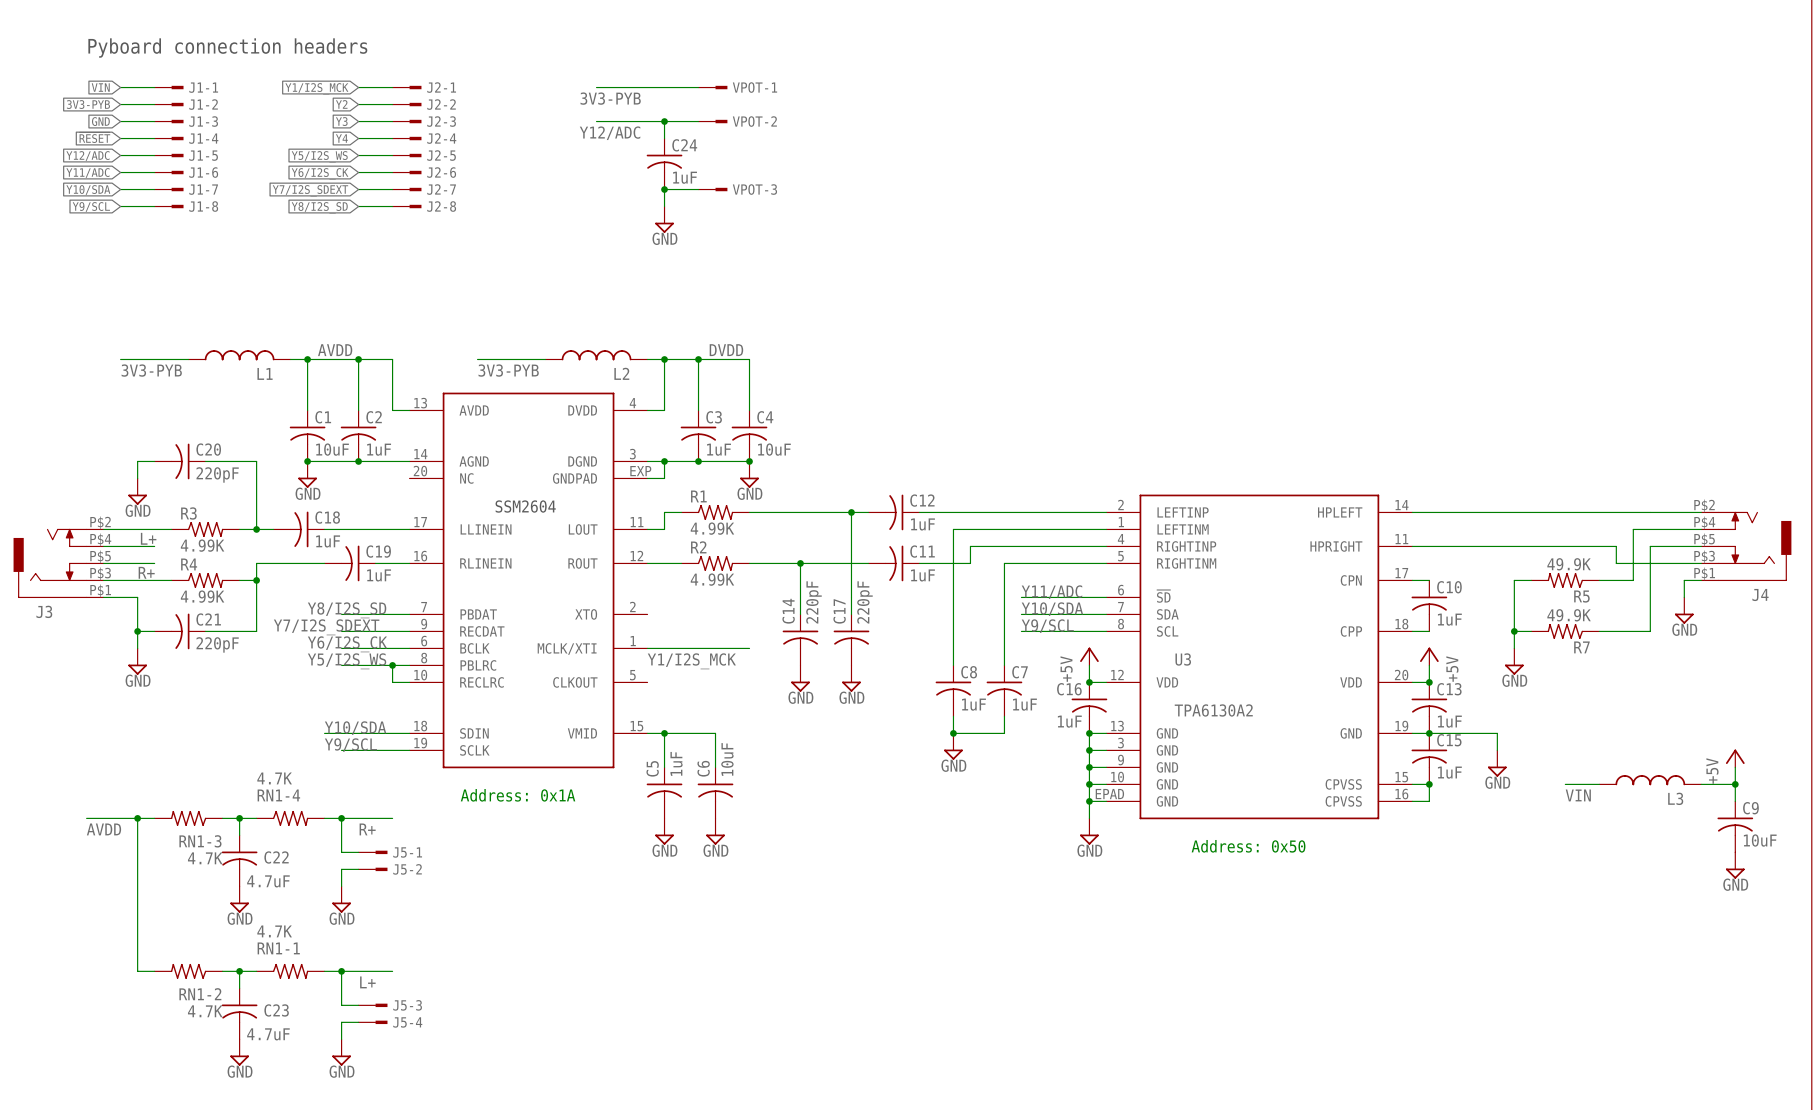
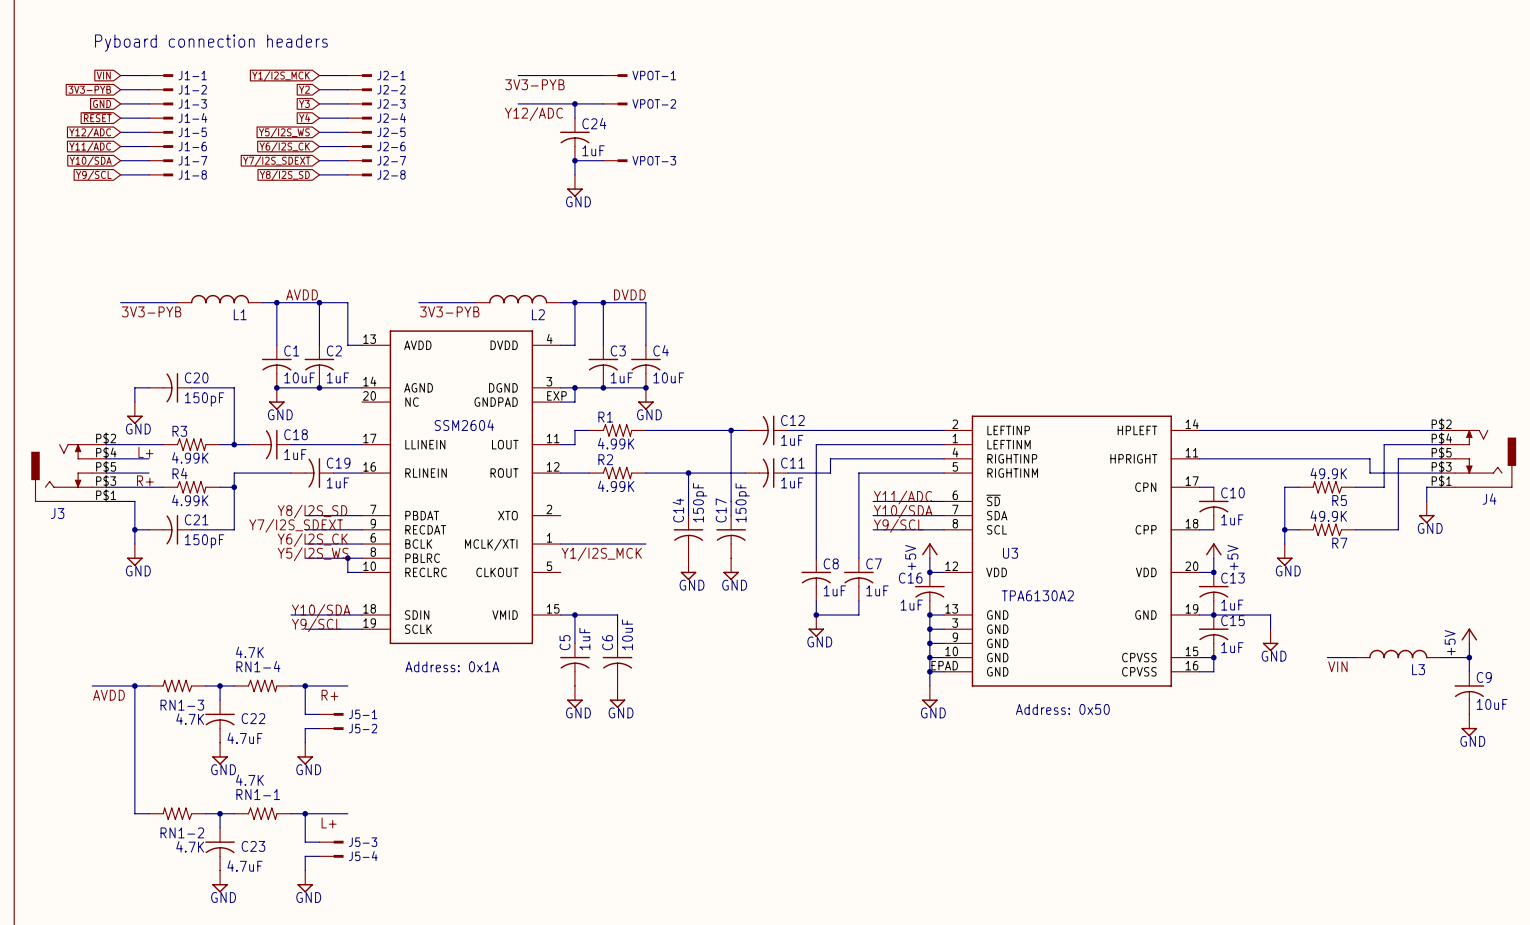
C20 value: 220pF (217, 474) -> 150pF (204, 399)
C14 value: 220pF (813, 602) -> 150pF (700, 502)
C17 value: 220pF (864, 602) -> 150pF (742, 502)
C21 value: 220pF (217, 644) -> 150pF (204, 541)

